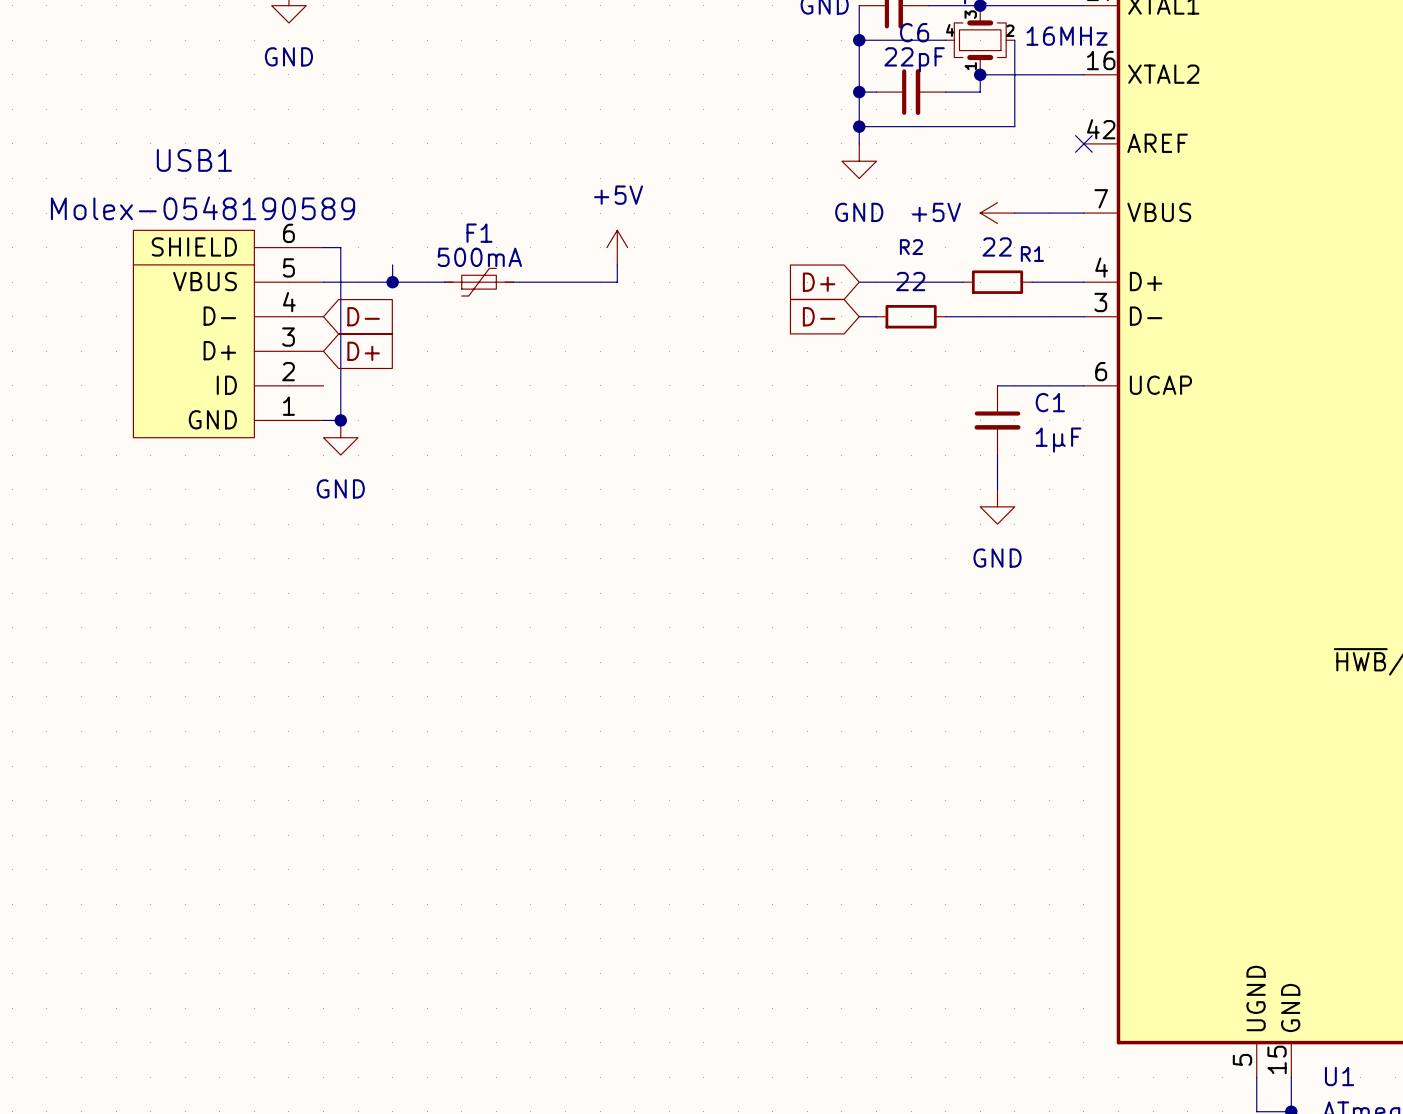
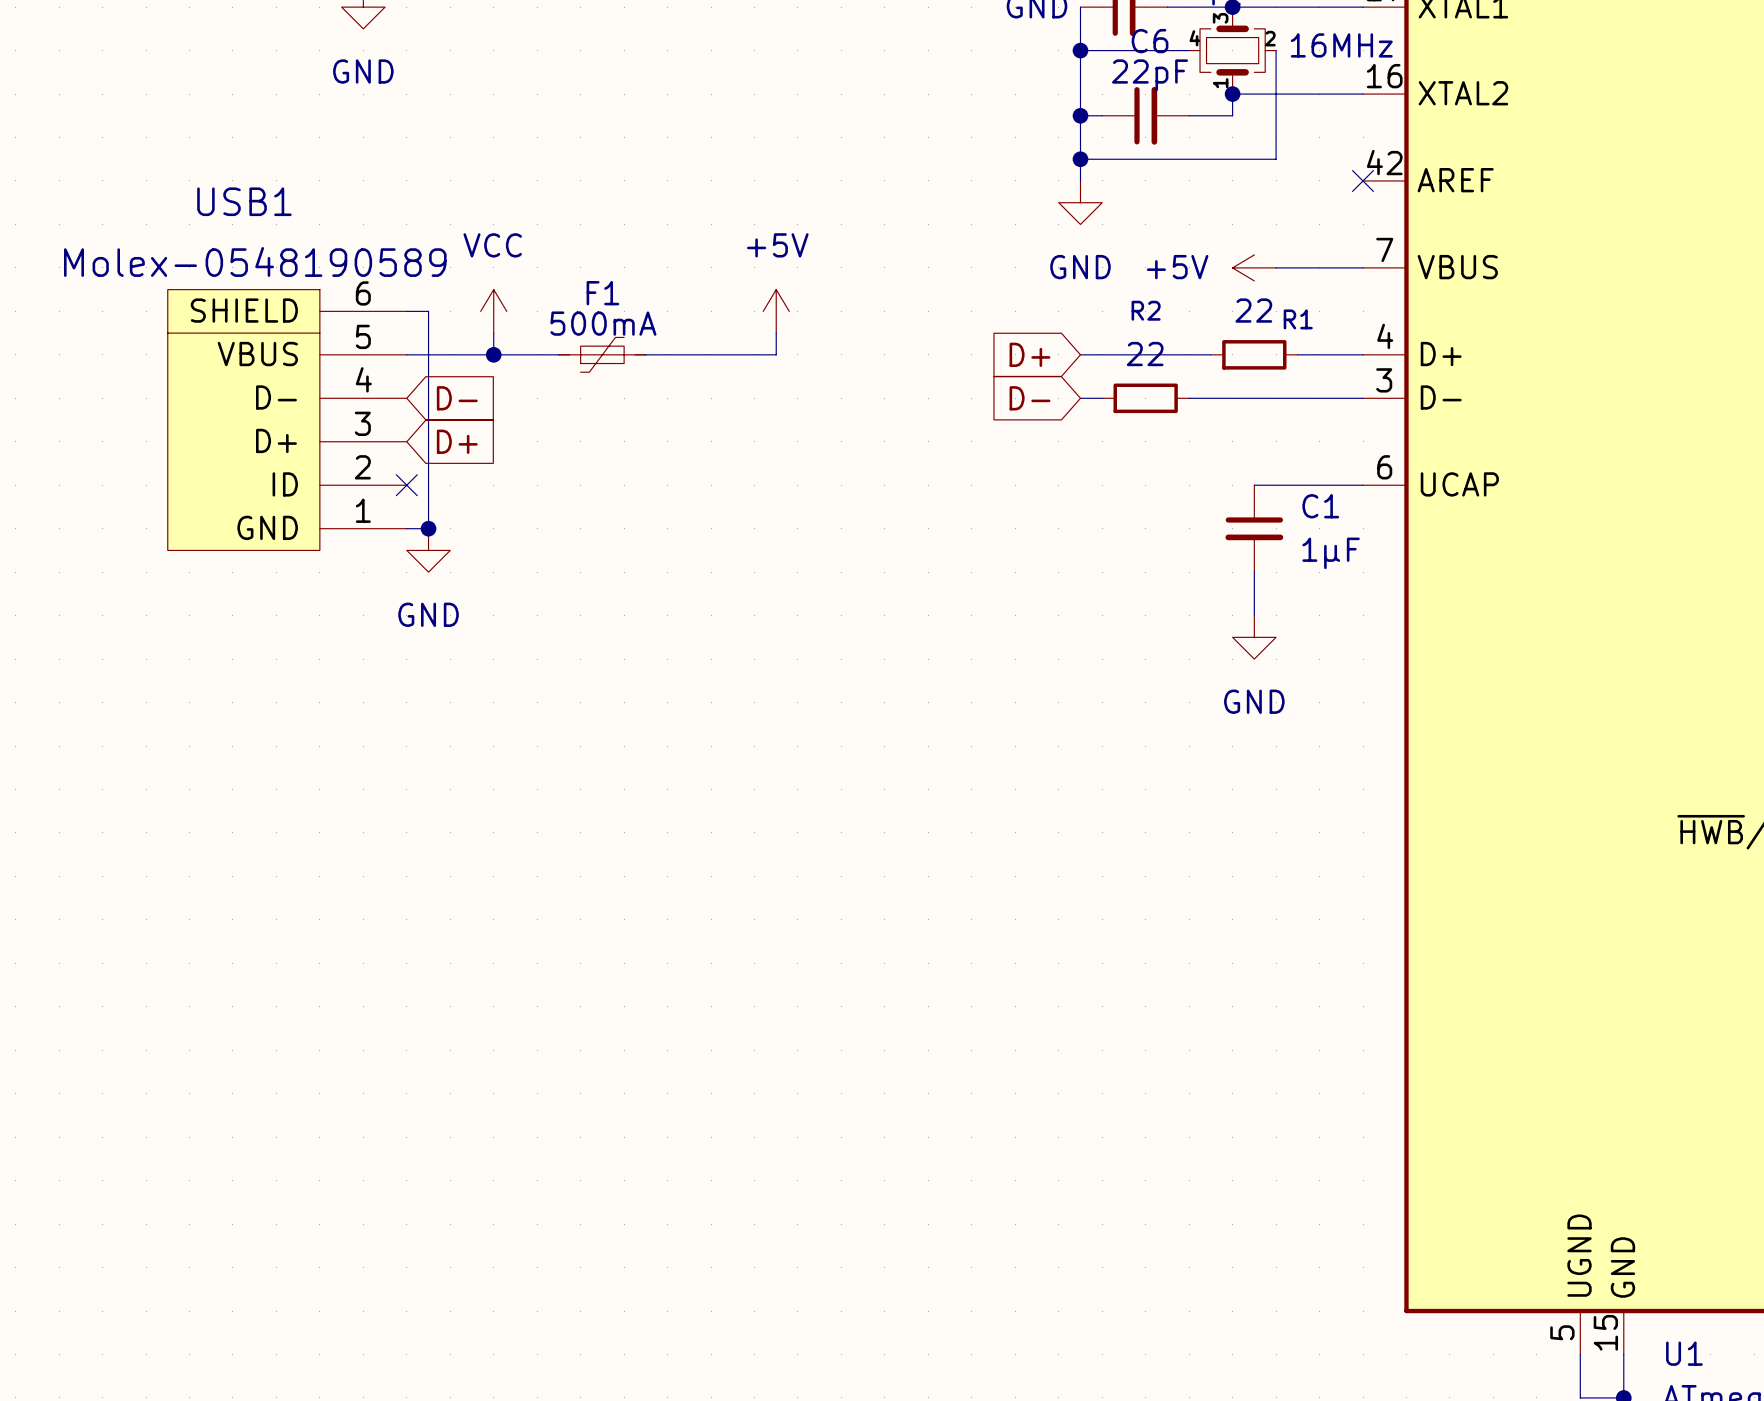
power symbol: none -> VCC (493, 311)
no-connect mark: none -> (406, 485)

